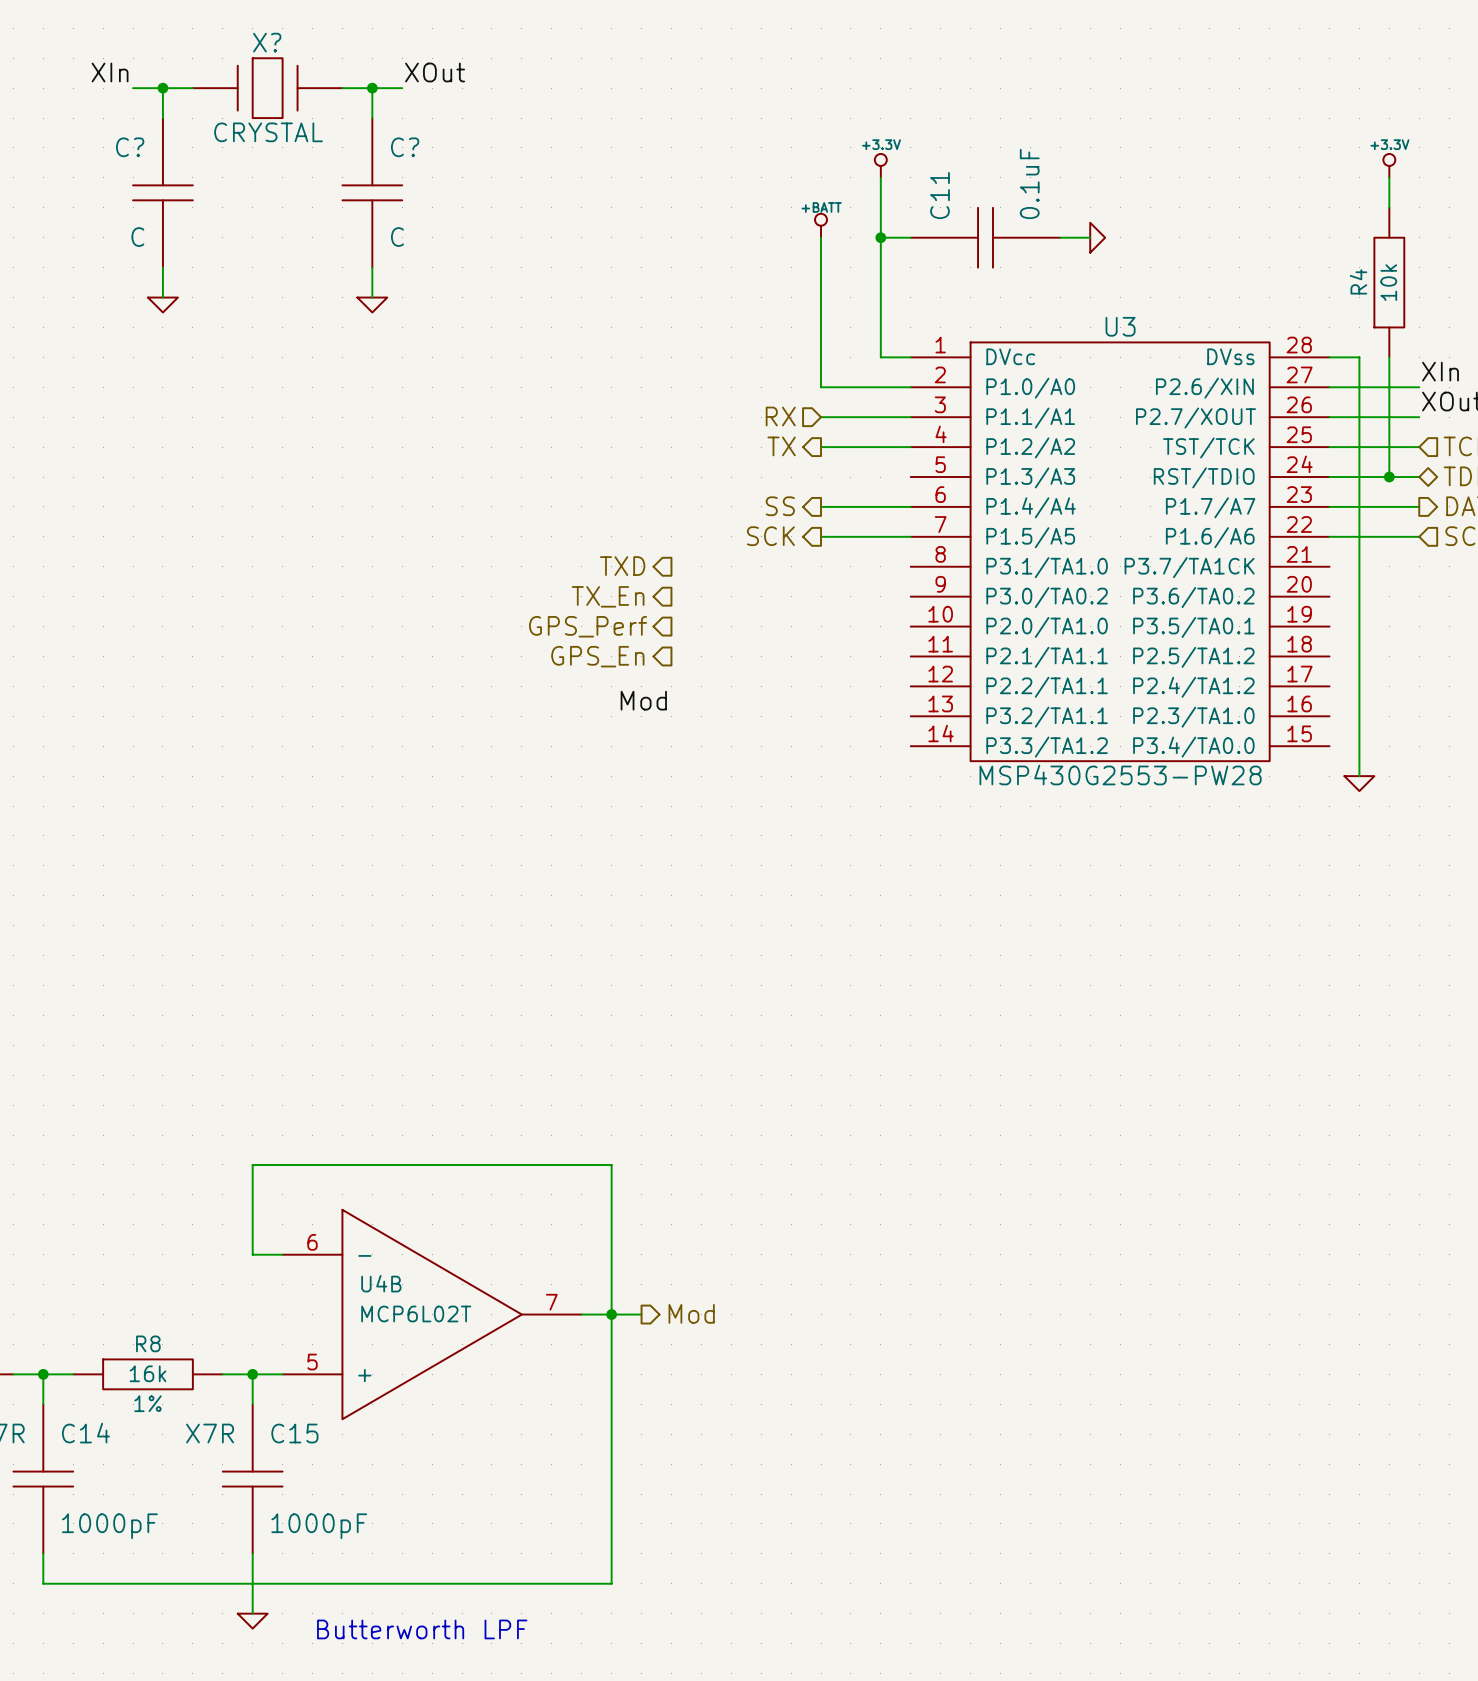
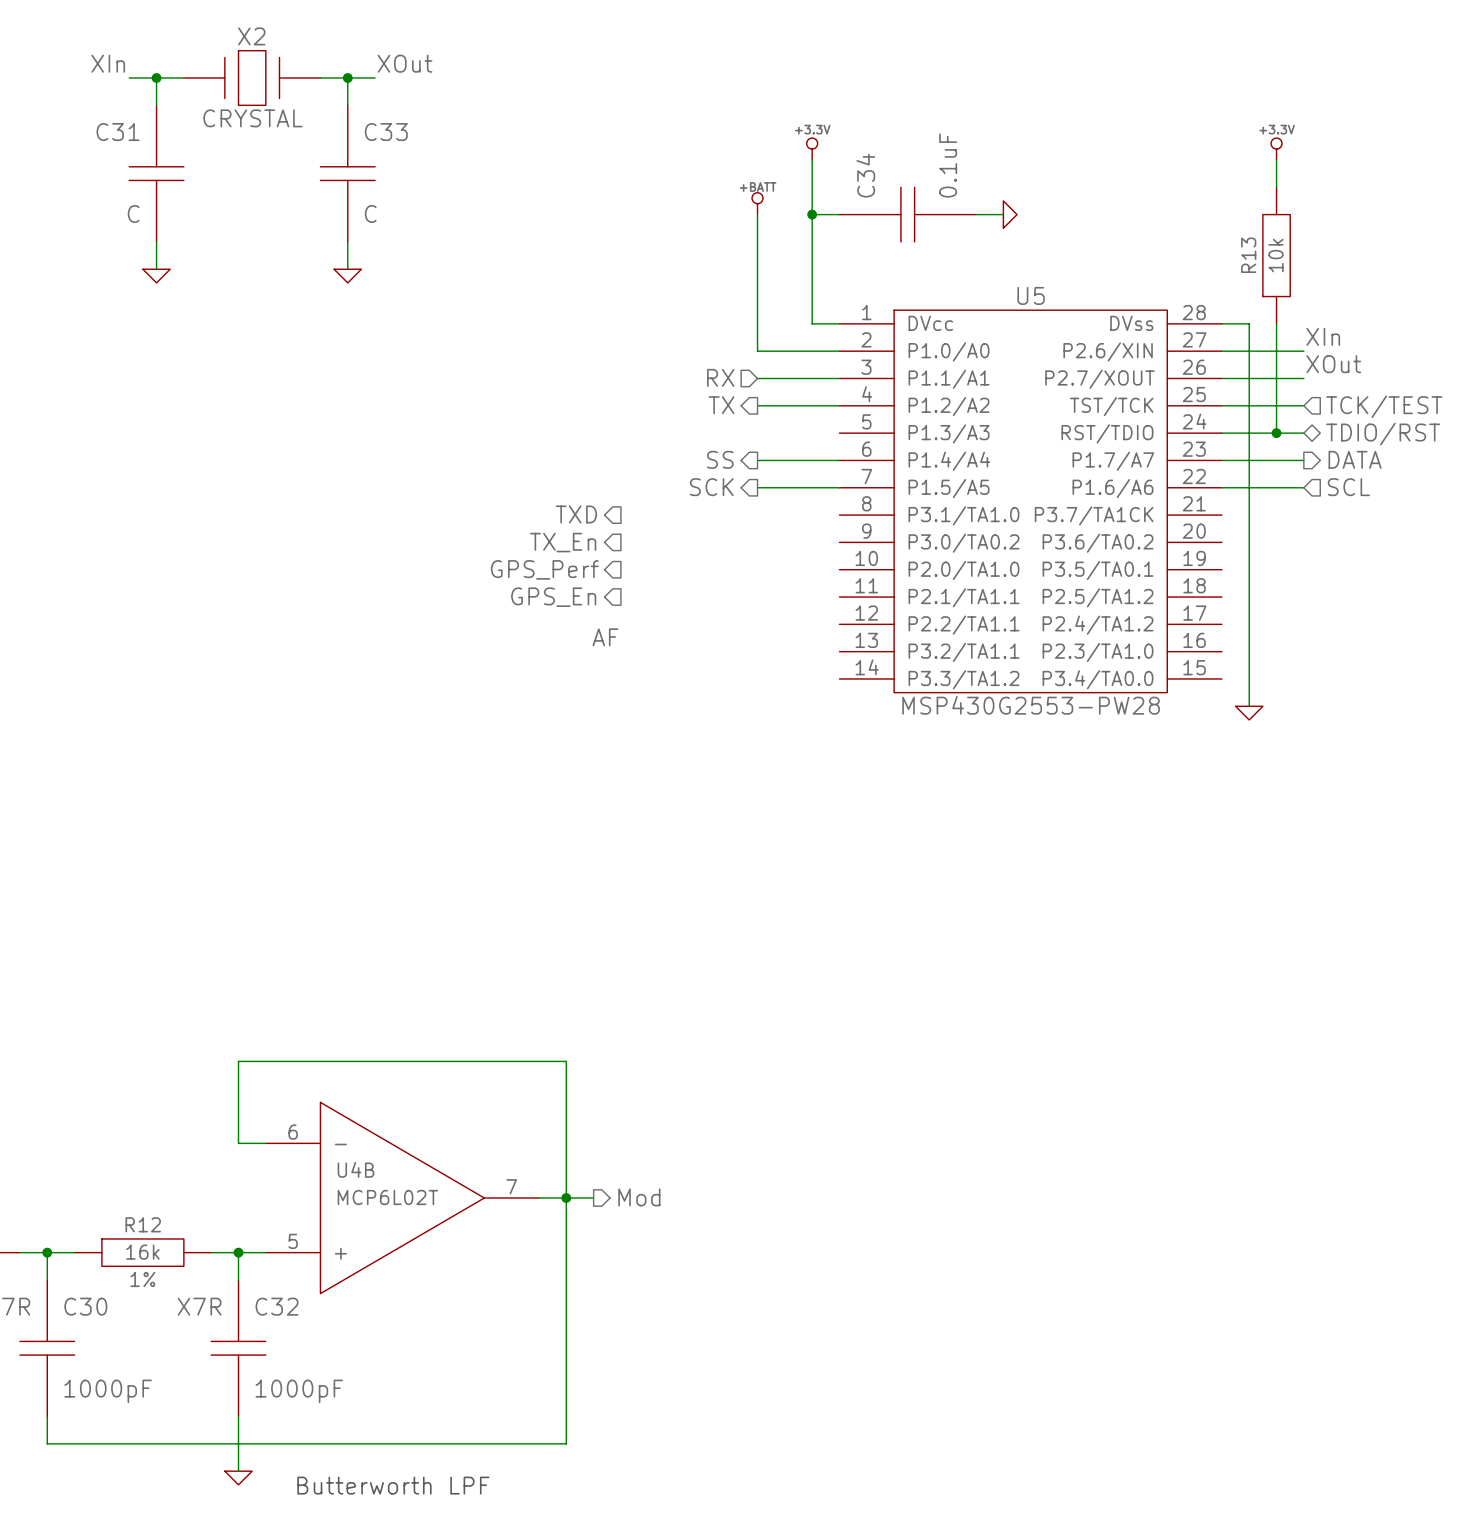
X? name: X? (267, 42) -> X2 (251, 36)
C? name: C? (130, 147) -> C31 (118, 132)
C? name: C? (405, 147) -> C33 (386, 132)
C11 name: C11 (939, 195) -> C34 (865, 175)
R4 name: R4 (1358, 281) -> R13 (1248, 255)
U3 name: U3 (1120, 326) -> U5 (1031, 295)
label: Mod (643, 700) -> AF (605, 637)
R8 name: R8 (148, 1343) -> R12 (143, 1224)
C14 name: C14 (85, 1433) -> C30 (85, 1306)
C15 name: C15 (294, 1433) -> C32 (277, 1306)

